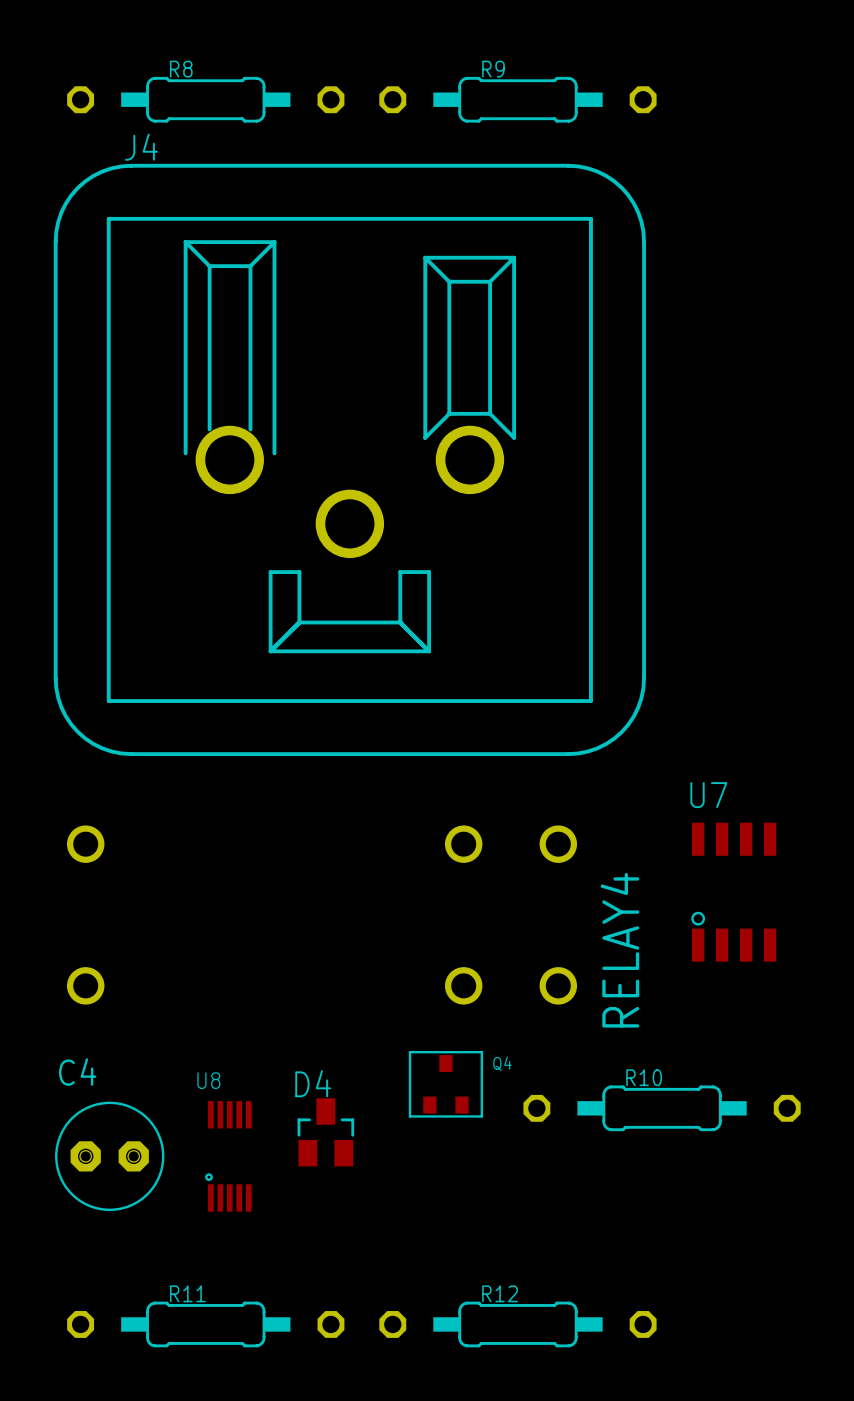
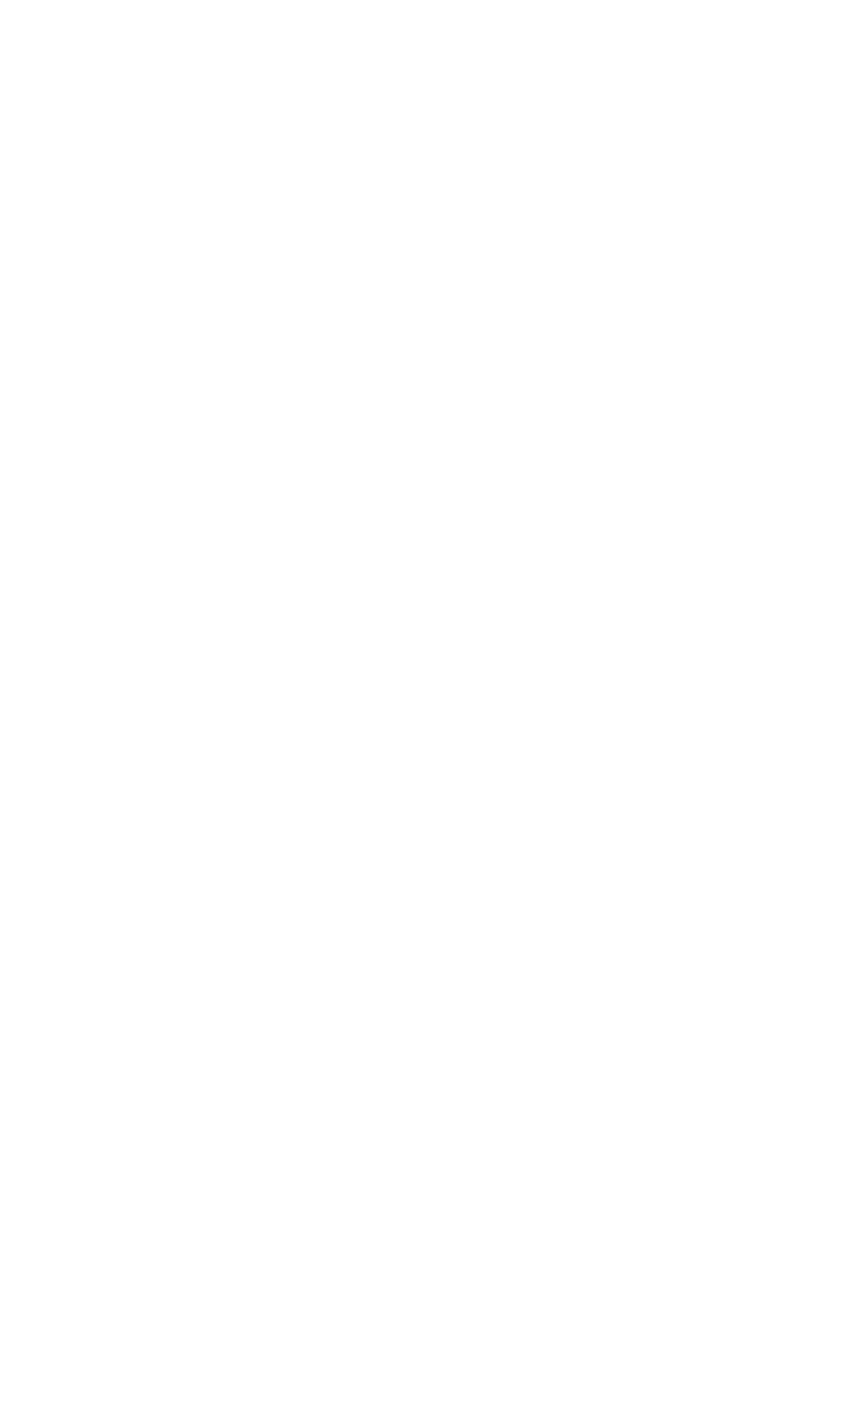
R8: (205, 99) -> none
R9: (517, 99) -> none
J4: (349, 459) -> none
U7: (733, 892) -> none
RELAY4: (322, 915) -> none
Q4: (445, 1084) -> none
R10: (662, 1108) -> none
D4: (325, 1132) -> none
C4: (109, 1156) -> none
U8: (228, 1156) -> none
R11: (205, 1324) -> none
R12: (517, 1324) -> none

